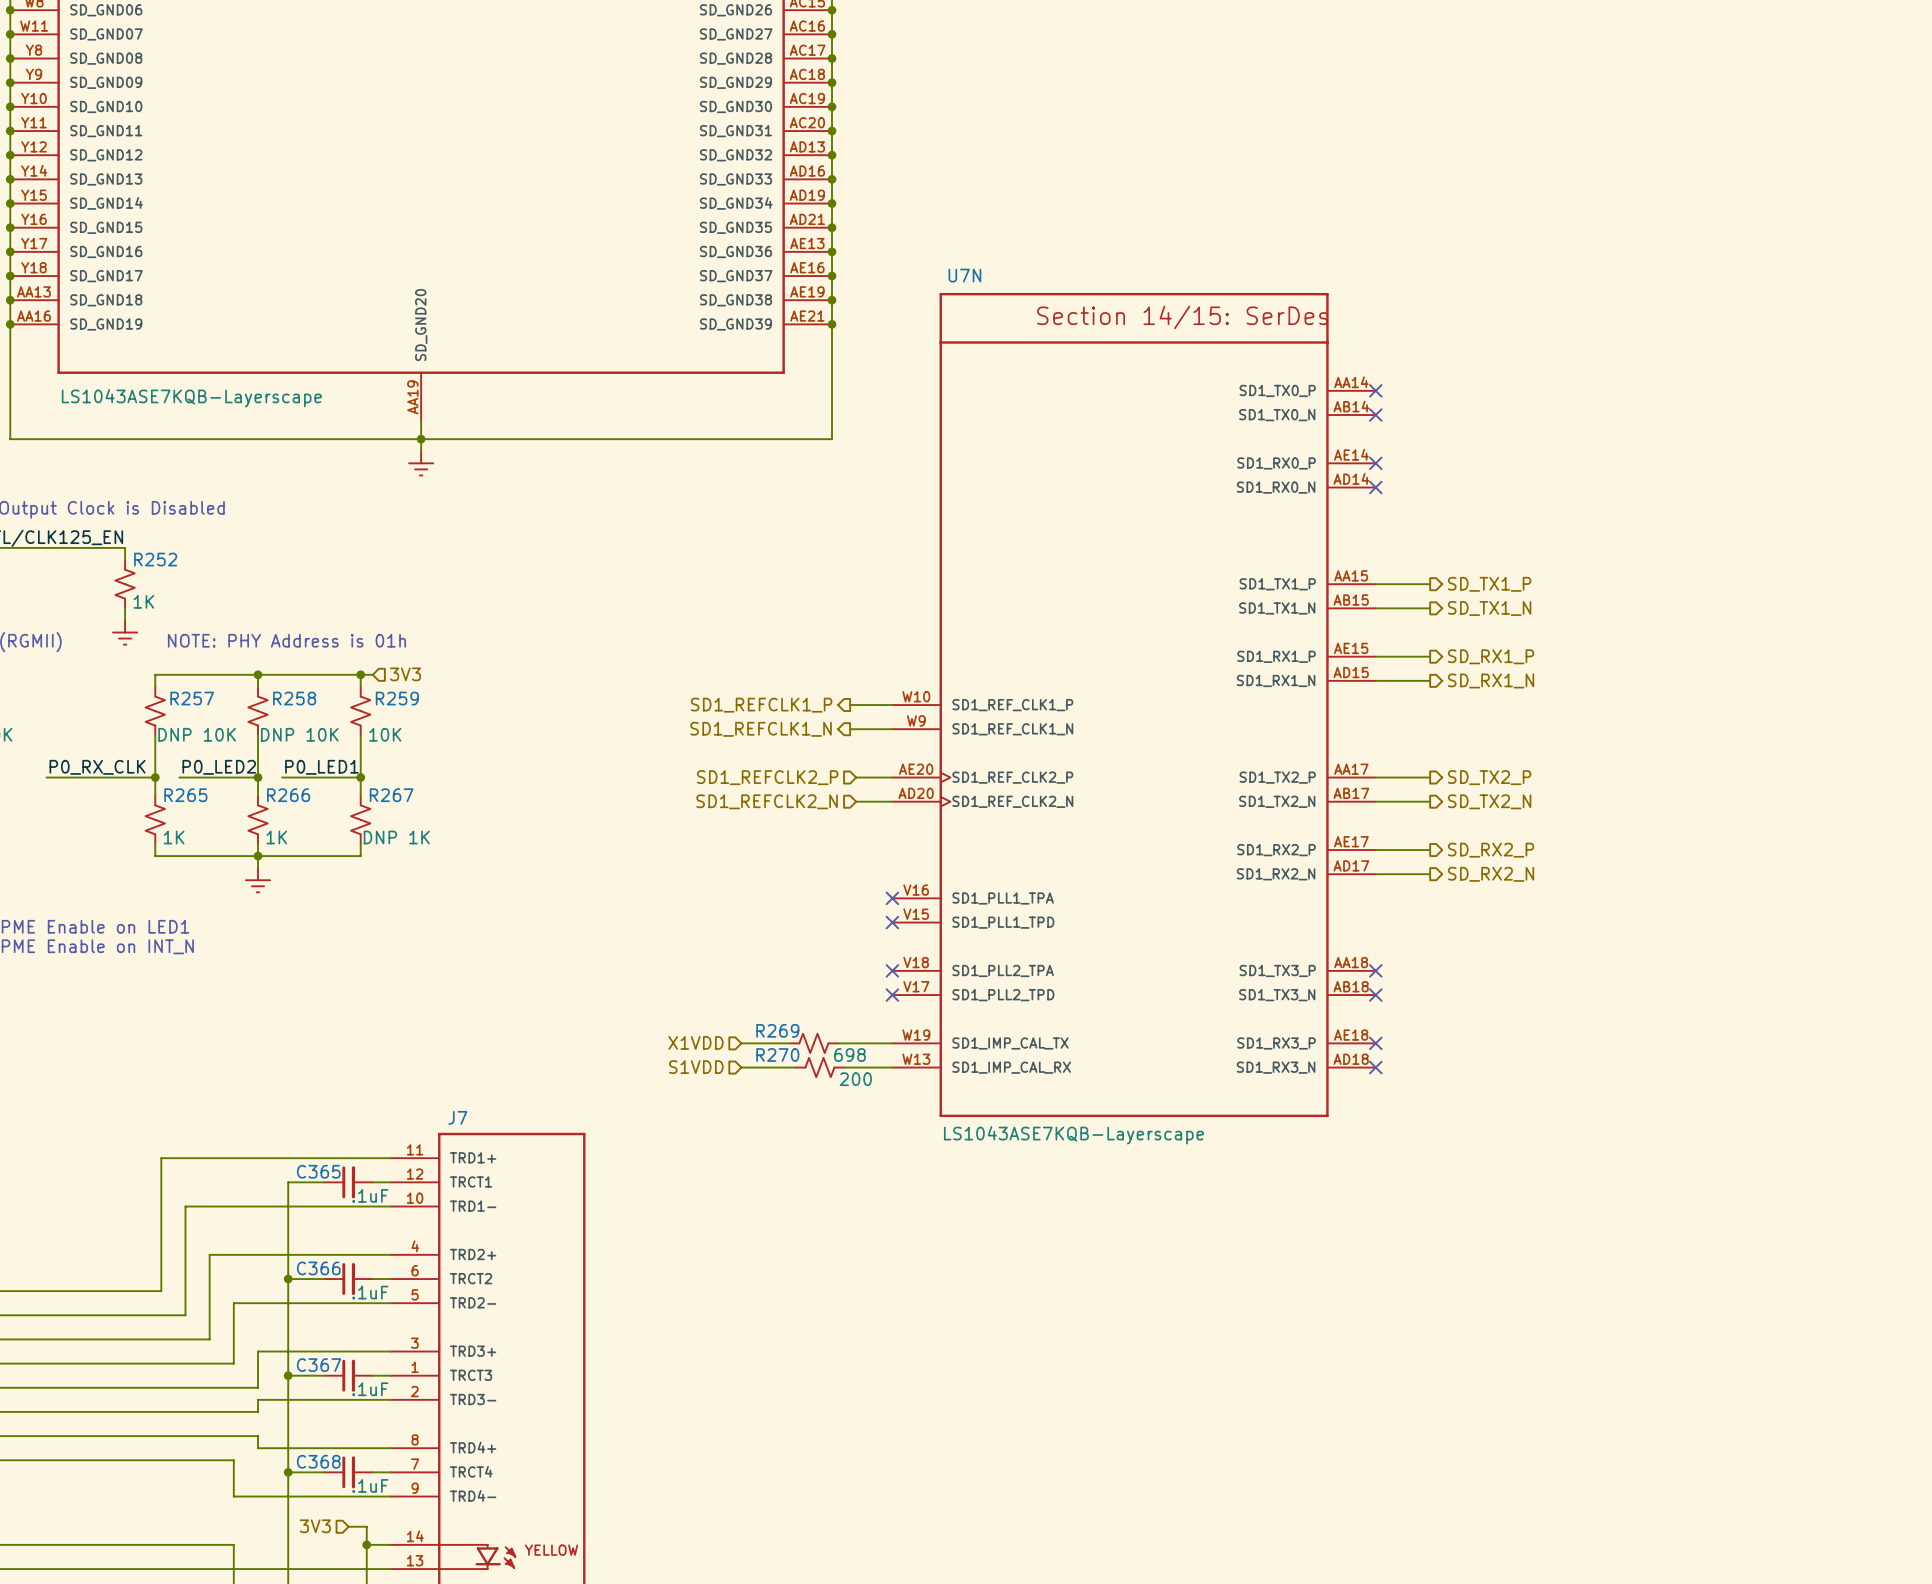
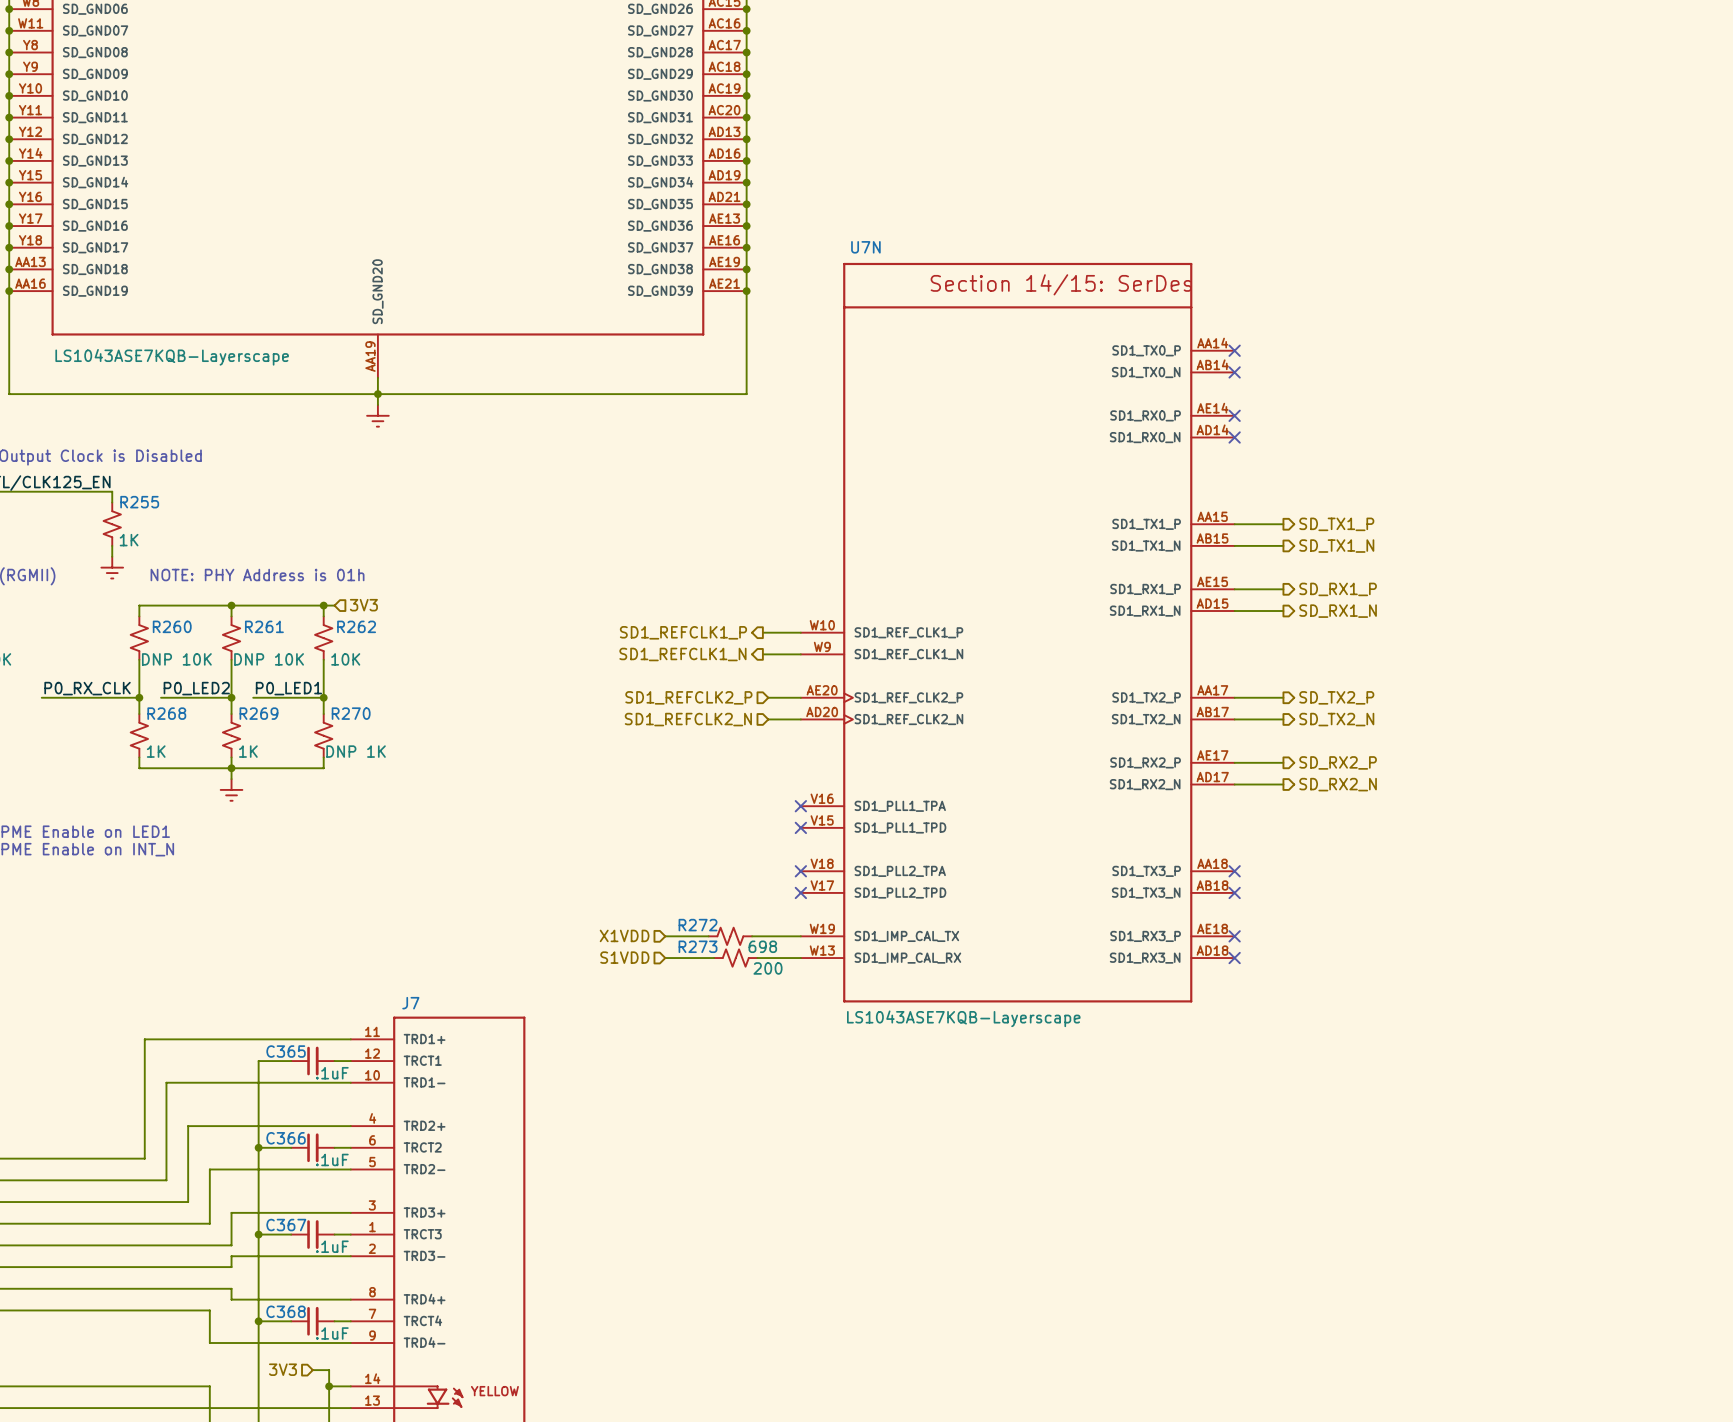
R252 name: R252 (155, 559) -> R255 (139, 502)
R257 name: R257 (192, 698) -> R260 (172, 626)
R258 name: R258 (294, 698) -> R261 (264, 626)
R259 name: R259 (397, 698) -> R262 (356, 626)
R265 name: R265 (185, 795) -> R268 (166, 713)
R266 name: R266 (288, 795) -> R269 (258, 713)
R267 name: R267 (391, 795) -> R270 (351, 713)
R269 name: R269 (777, 1030) -> R272 (698, 925)
R270 name: R270 (777, 1055) -> R273 (698, 946)

